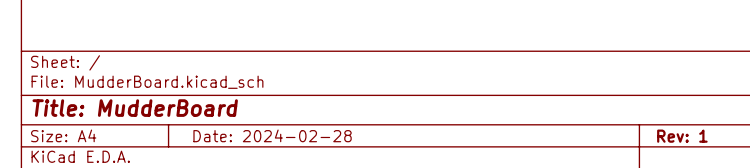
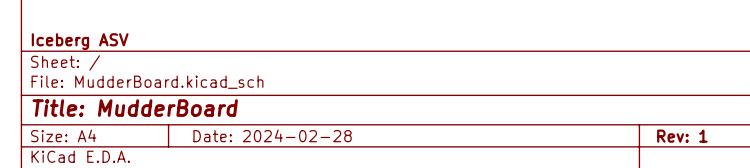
title block: none -> Iceberg ASV (80, 41)

